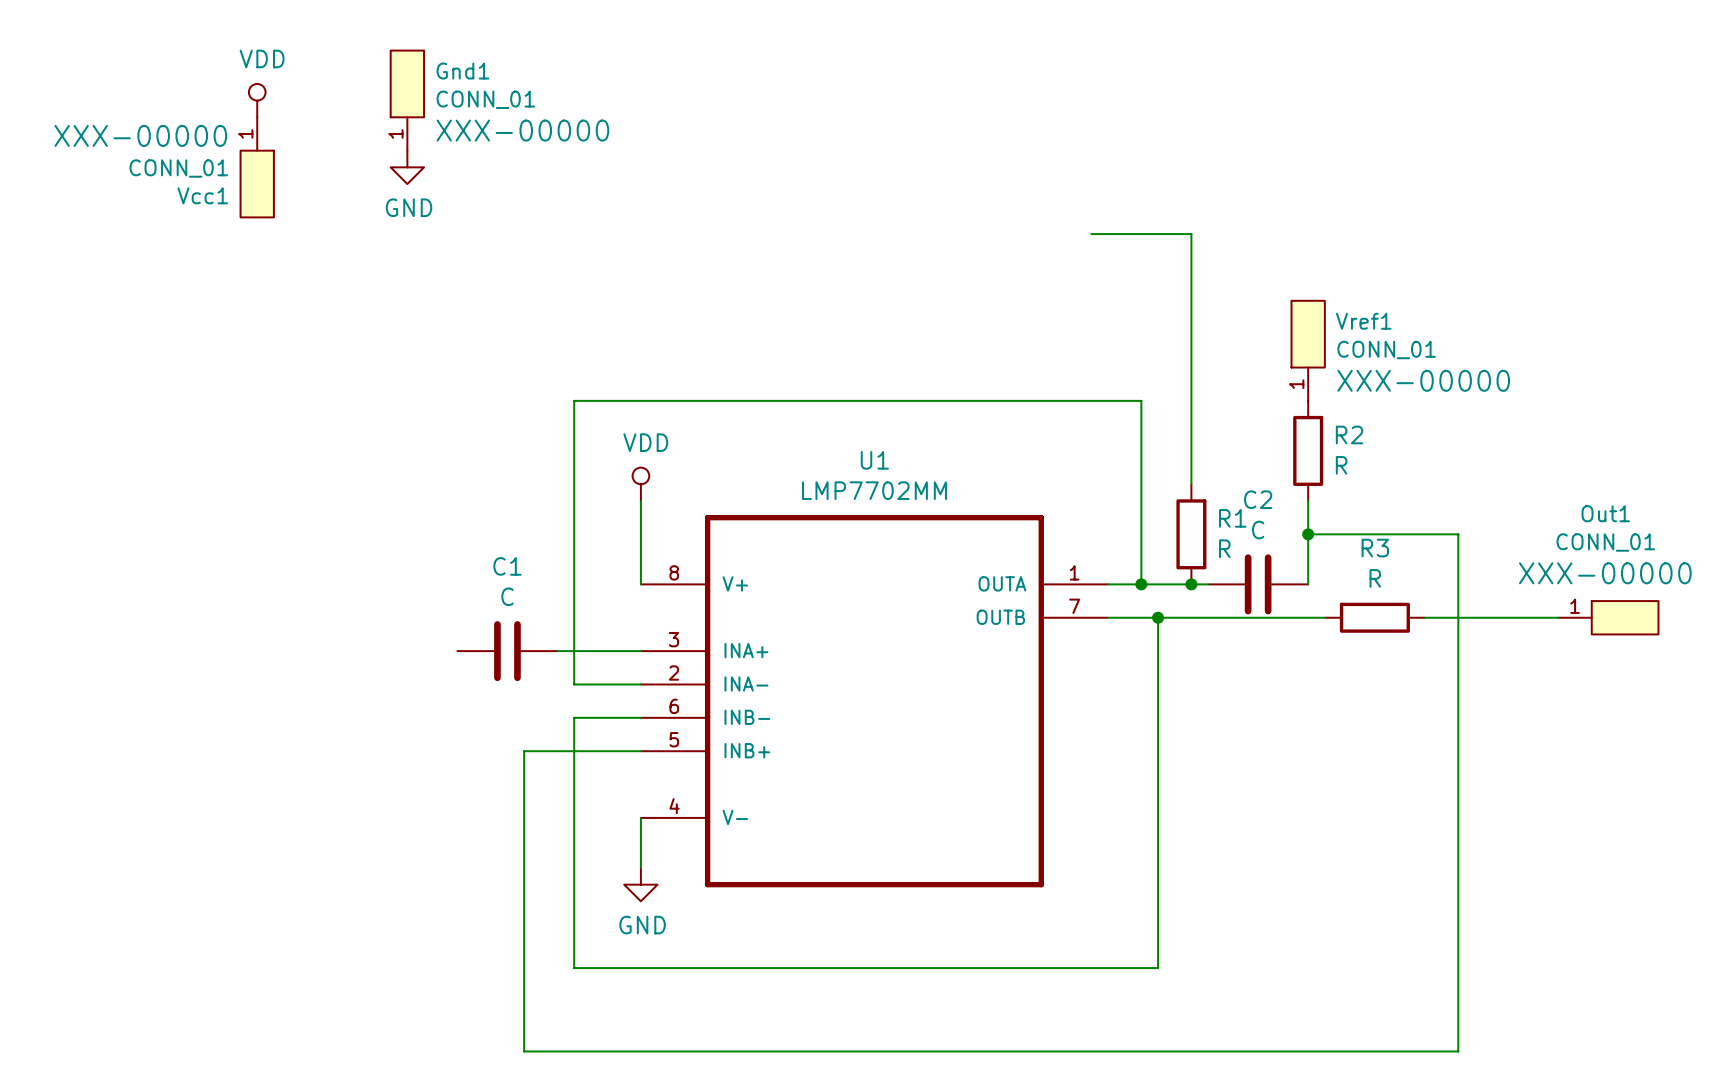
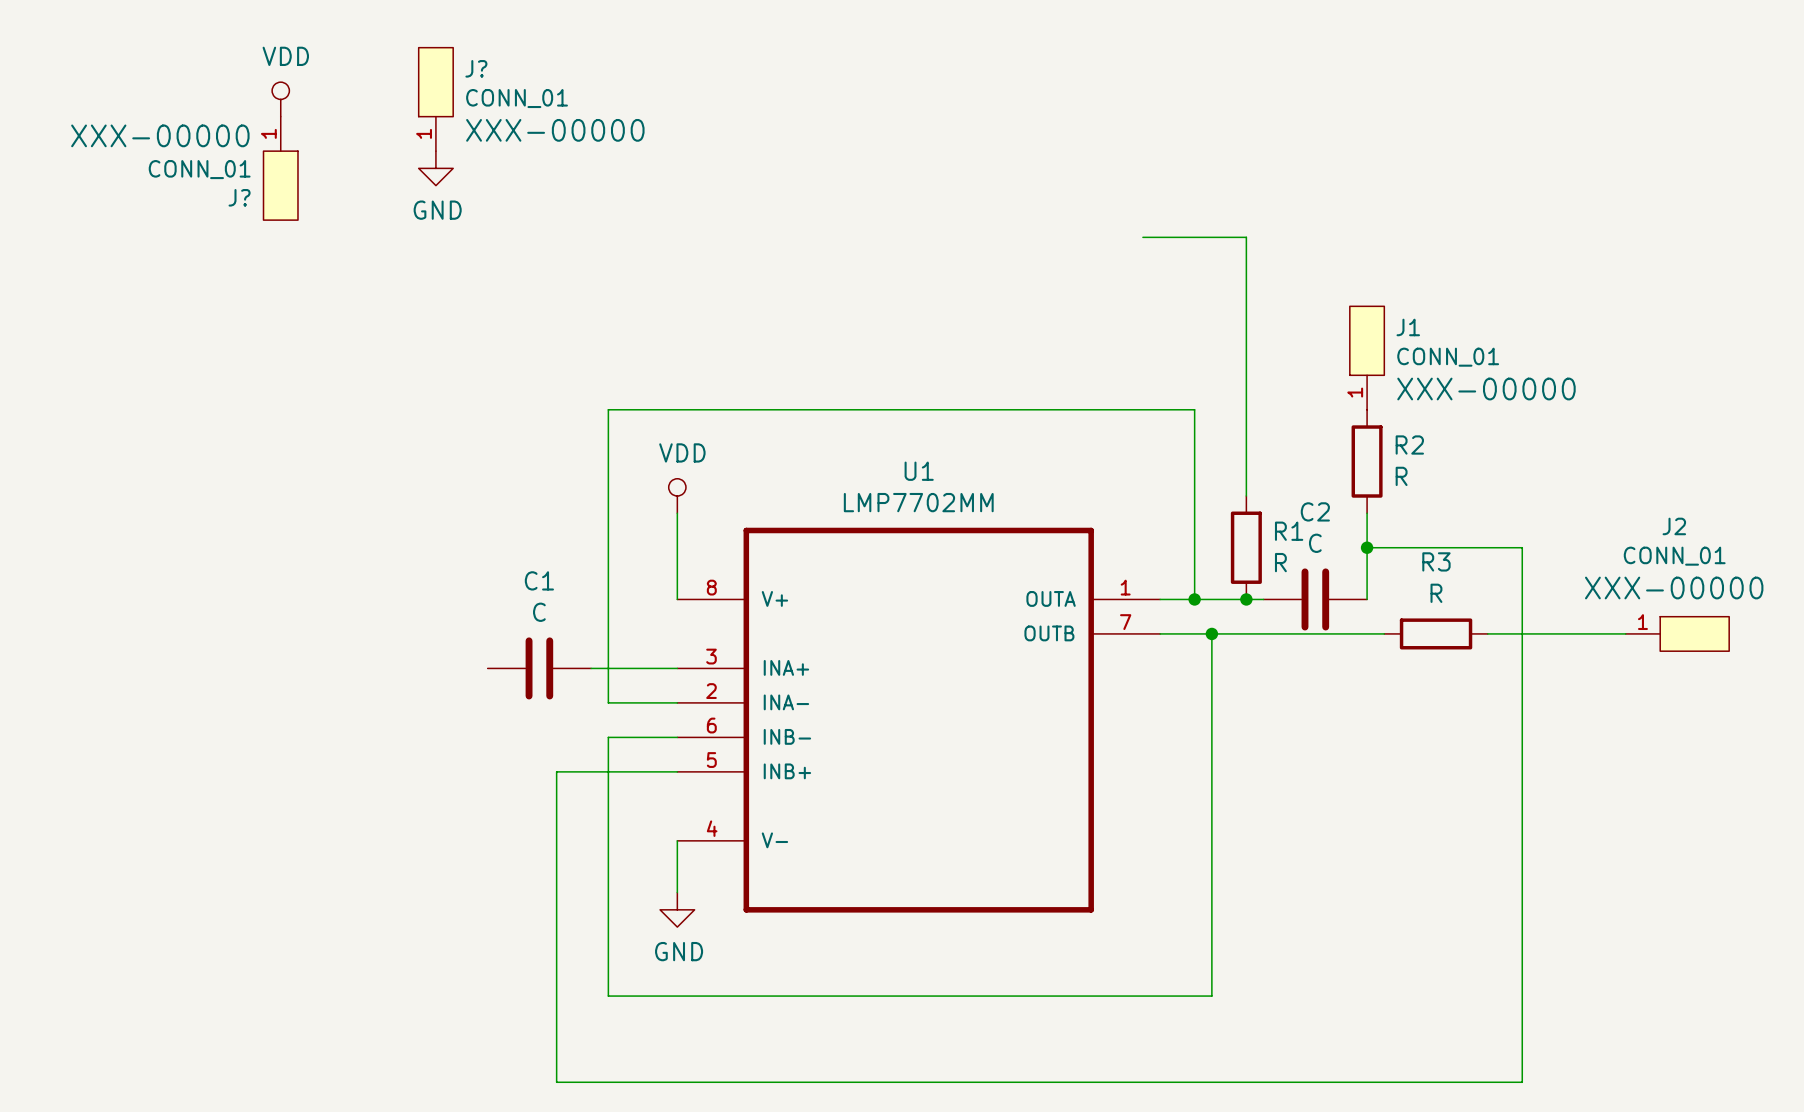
Gnd1 name: Gnd1 (462, 71) -> J? (476, 68)
Vcc1 name: Vcc1 (202, 195) -> J? (239, 197)
Vref1 name: Vref1 (1363, 321) -> J1 (1408, 327)
Out1 name: Out1 (1605, 513) -> J2 (1674, 526)

